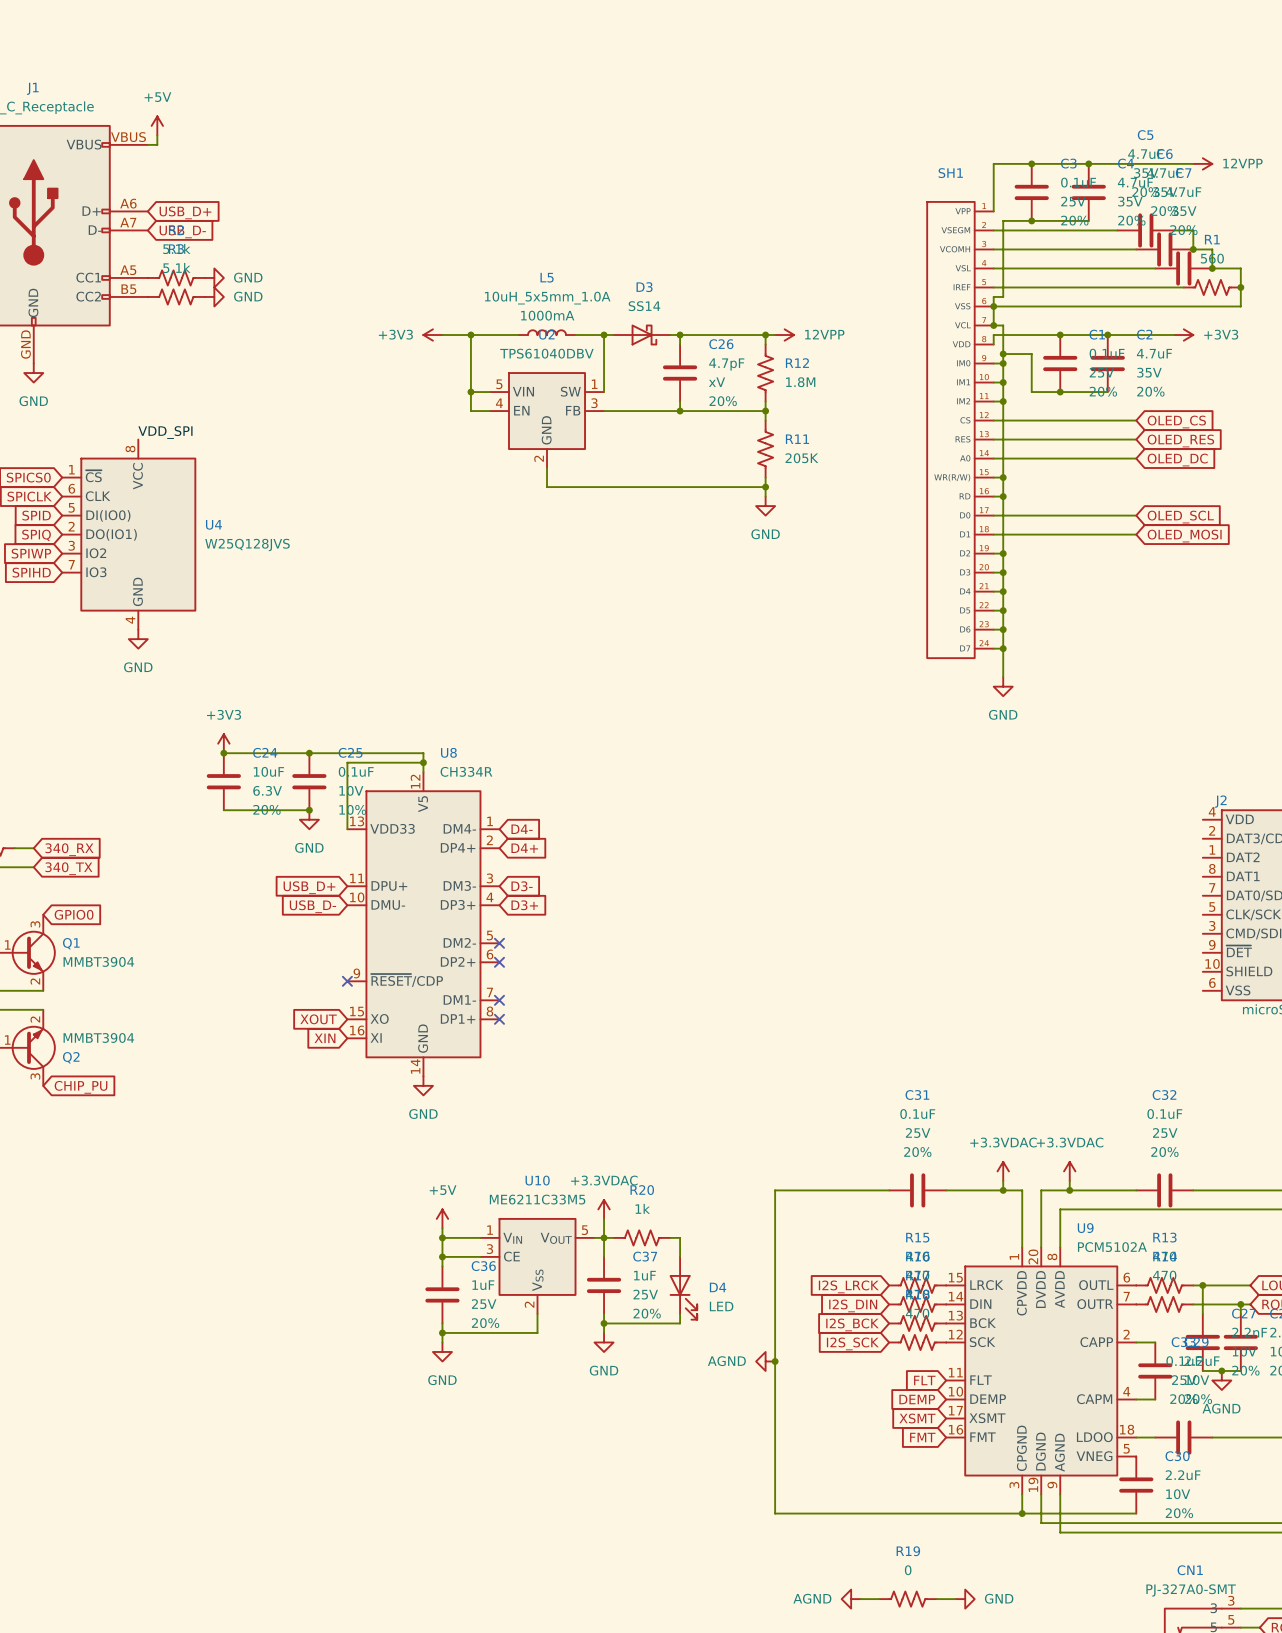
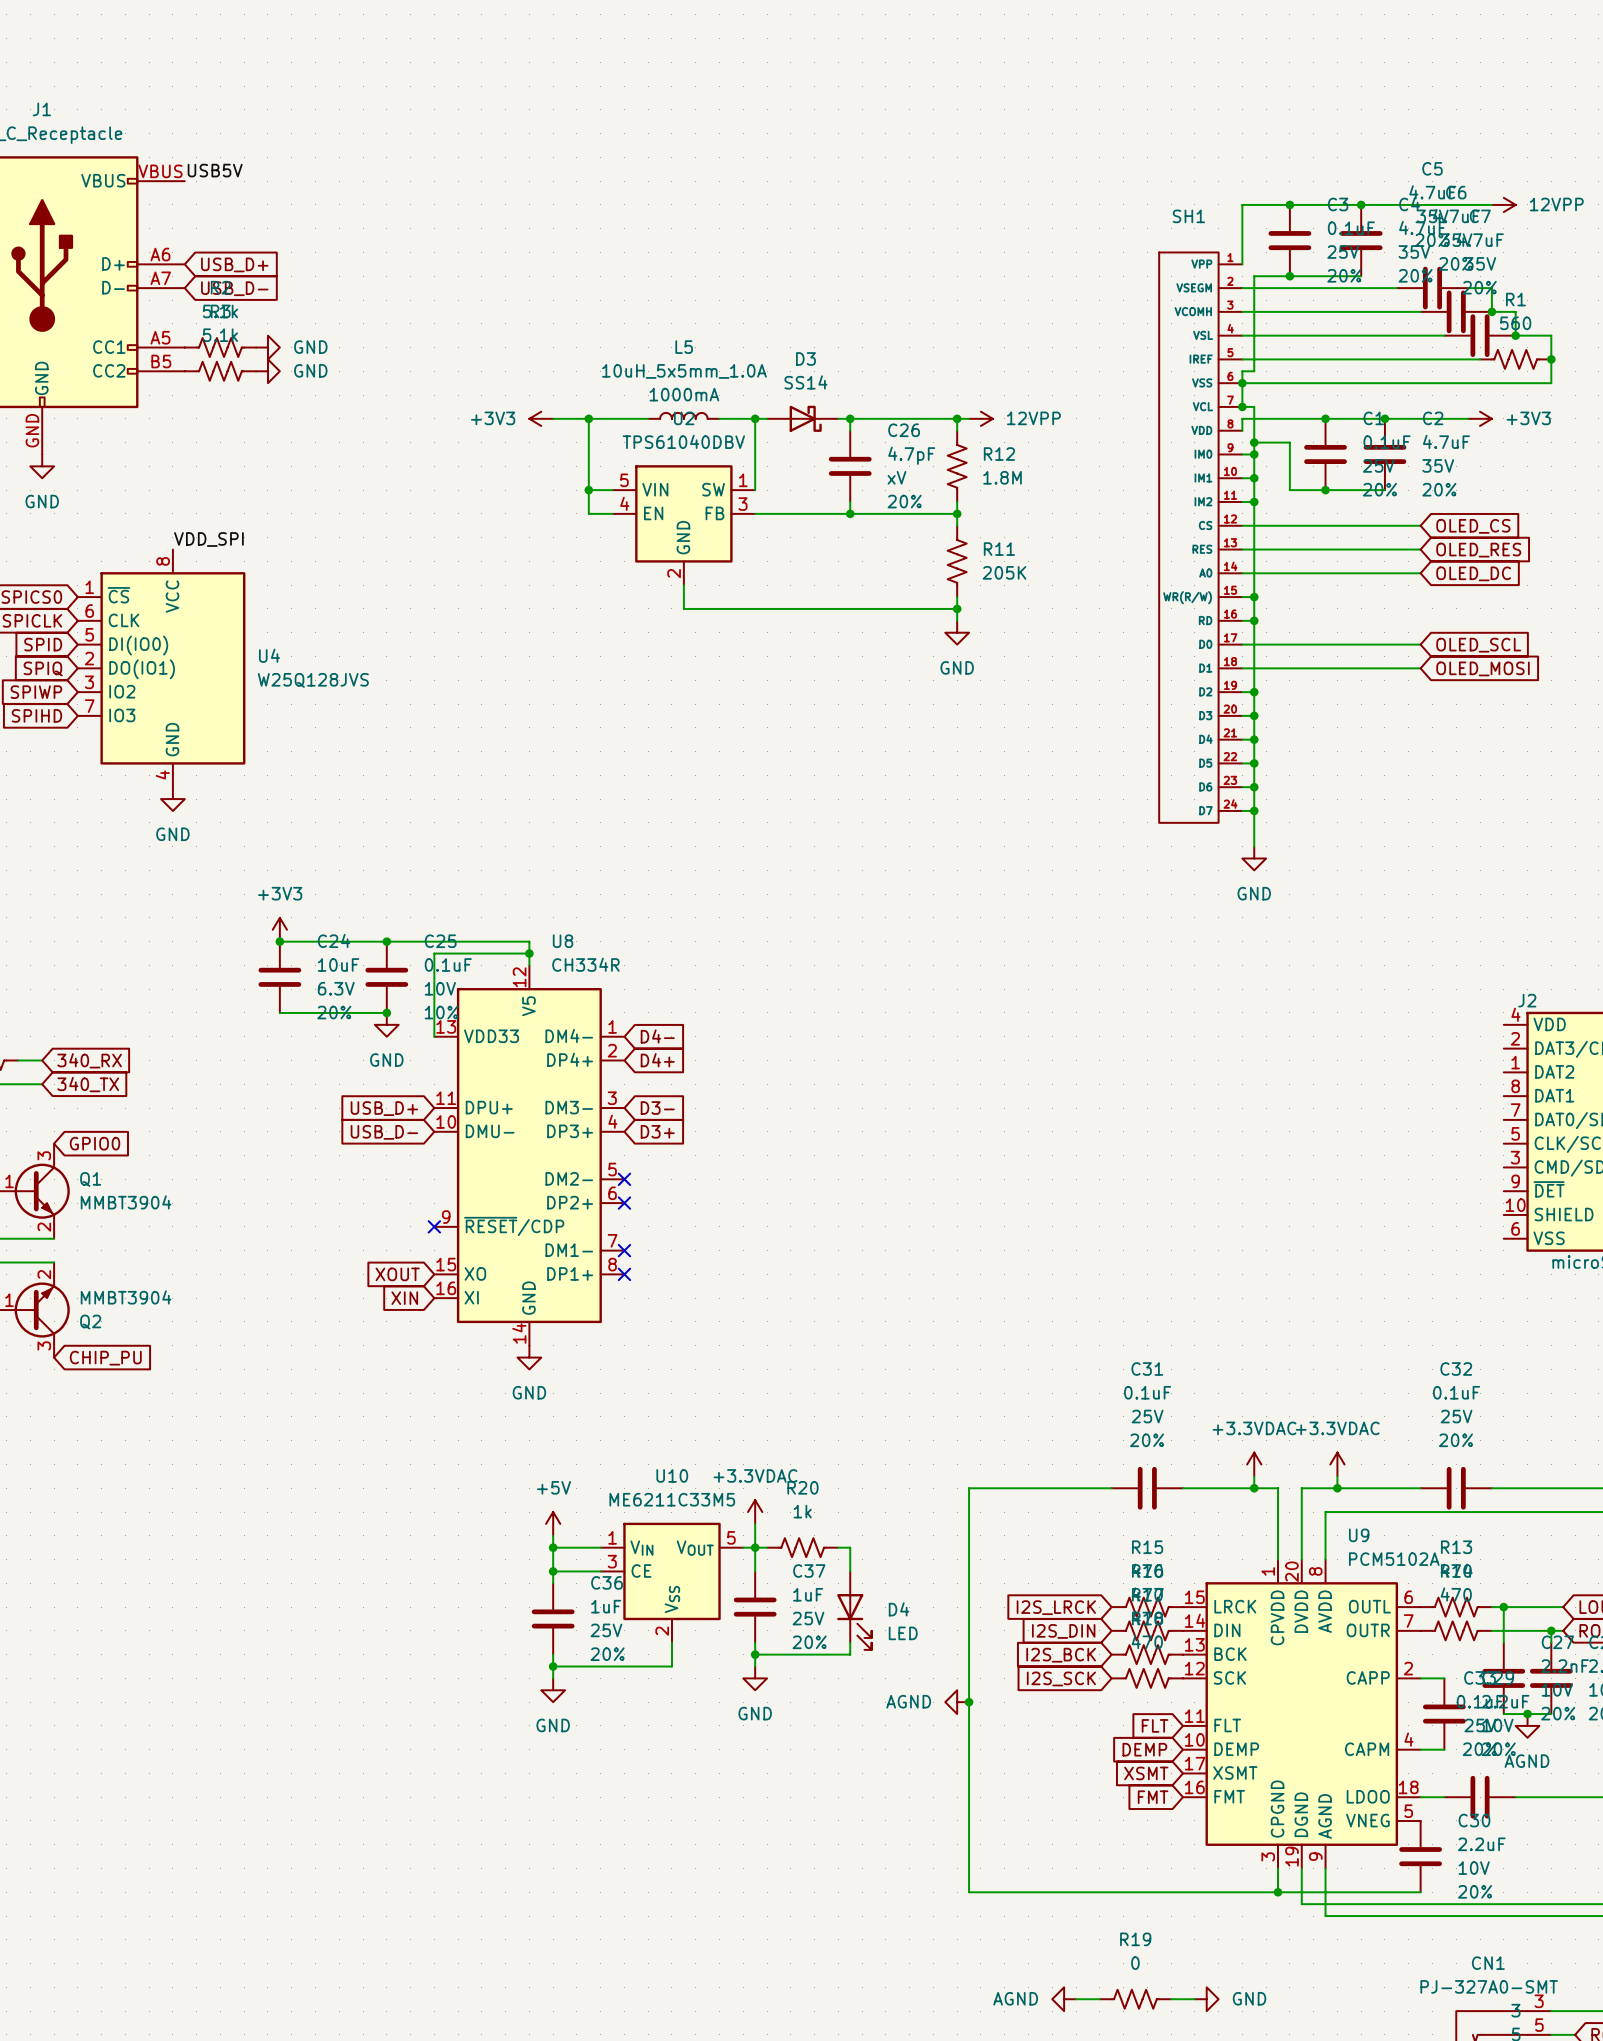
power symbol: +5V (157, 125) -> none
wire: (157, 135) (157, 144) (147, 144) -> none
label: none -> USB5V (215, 170)

